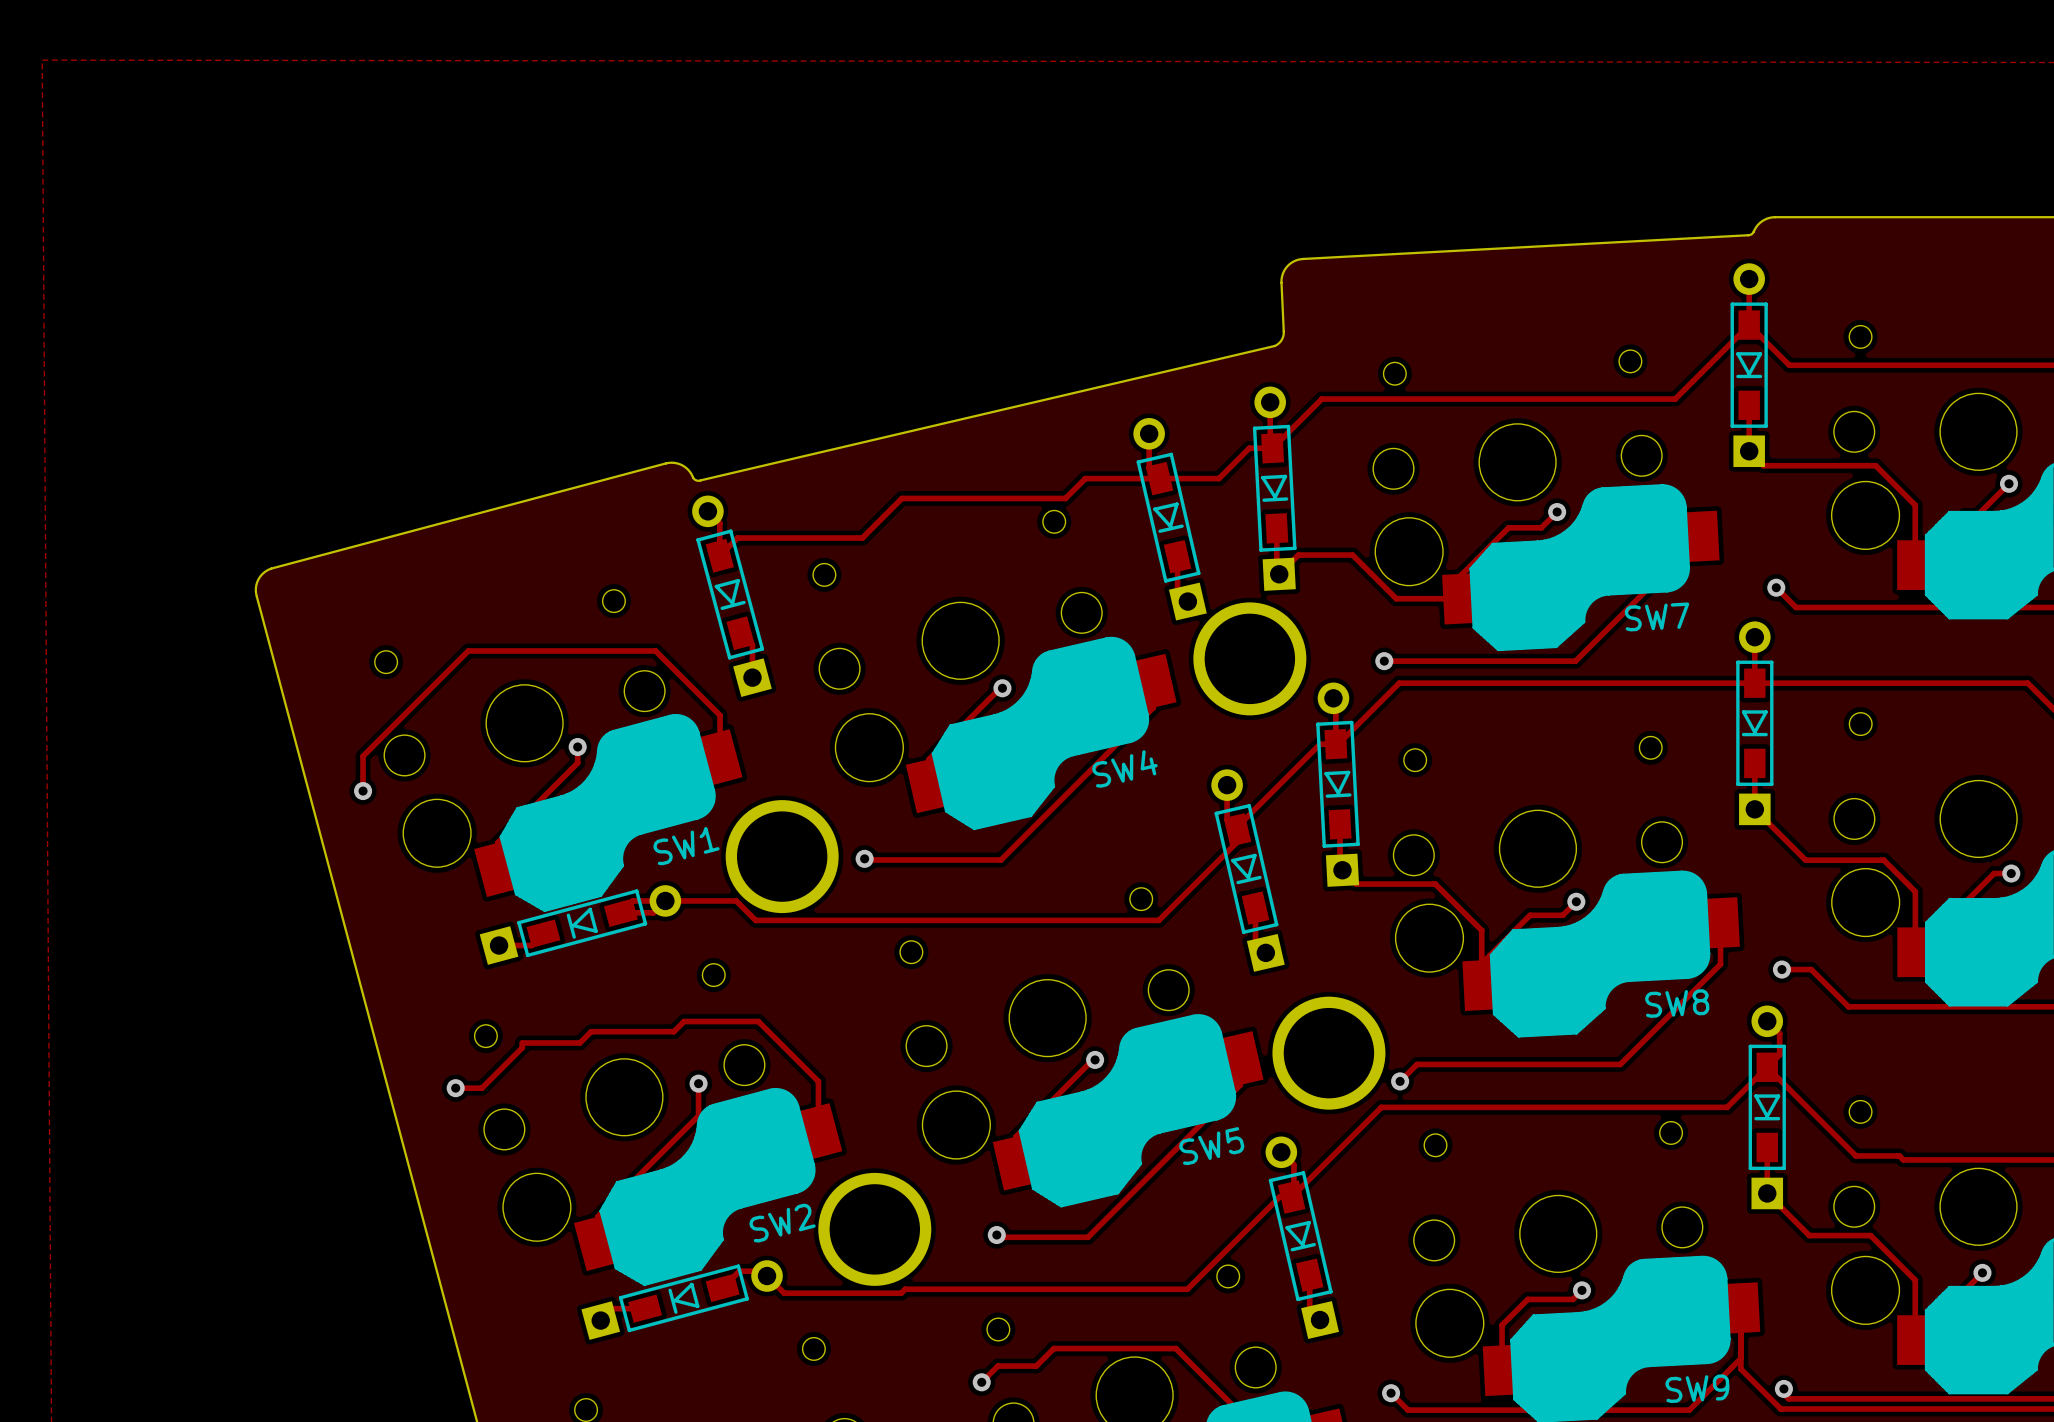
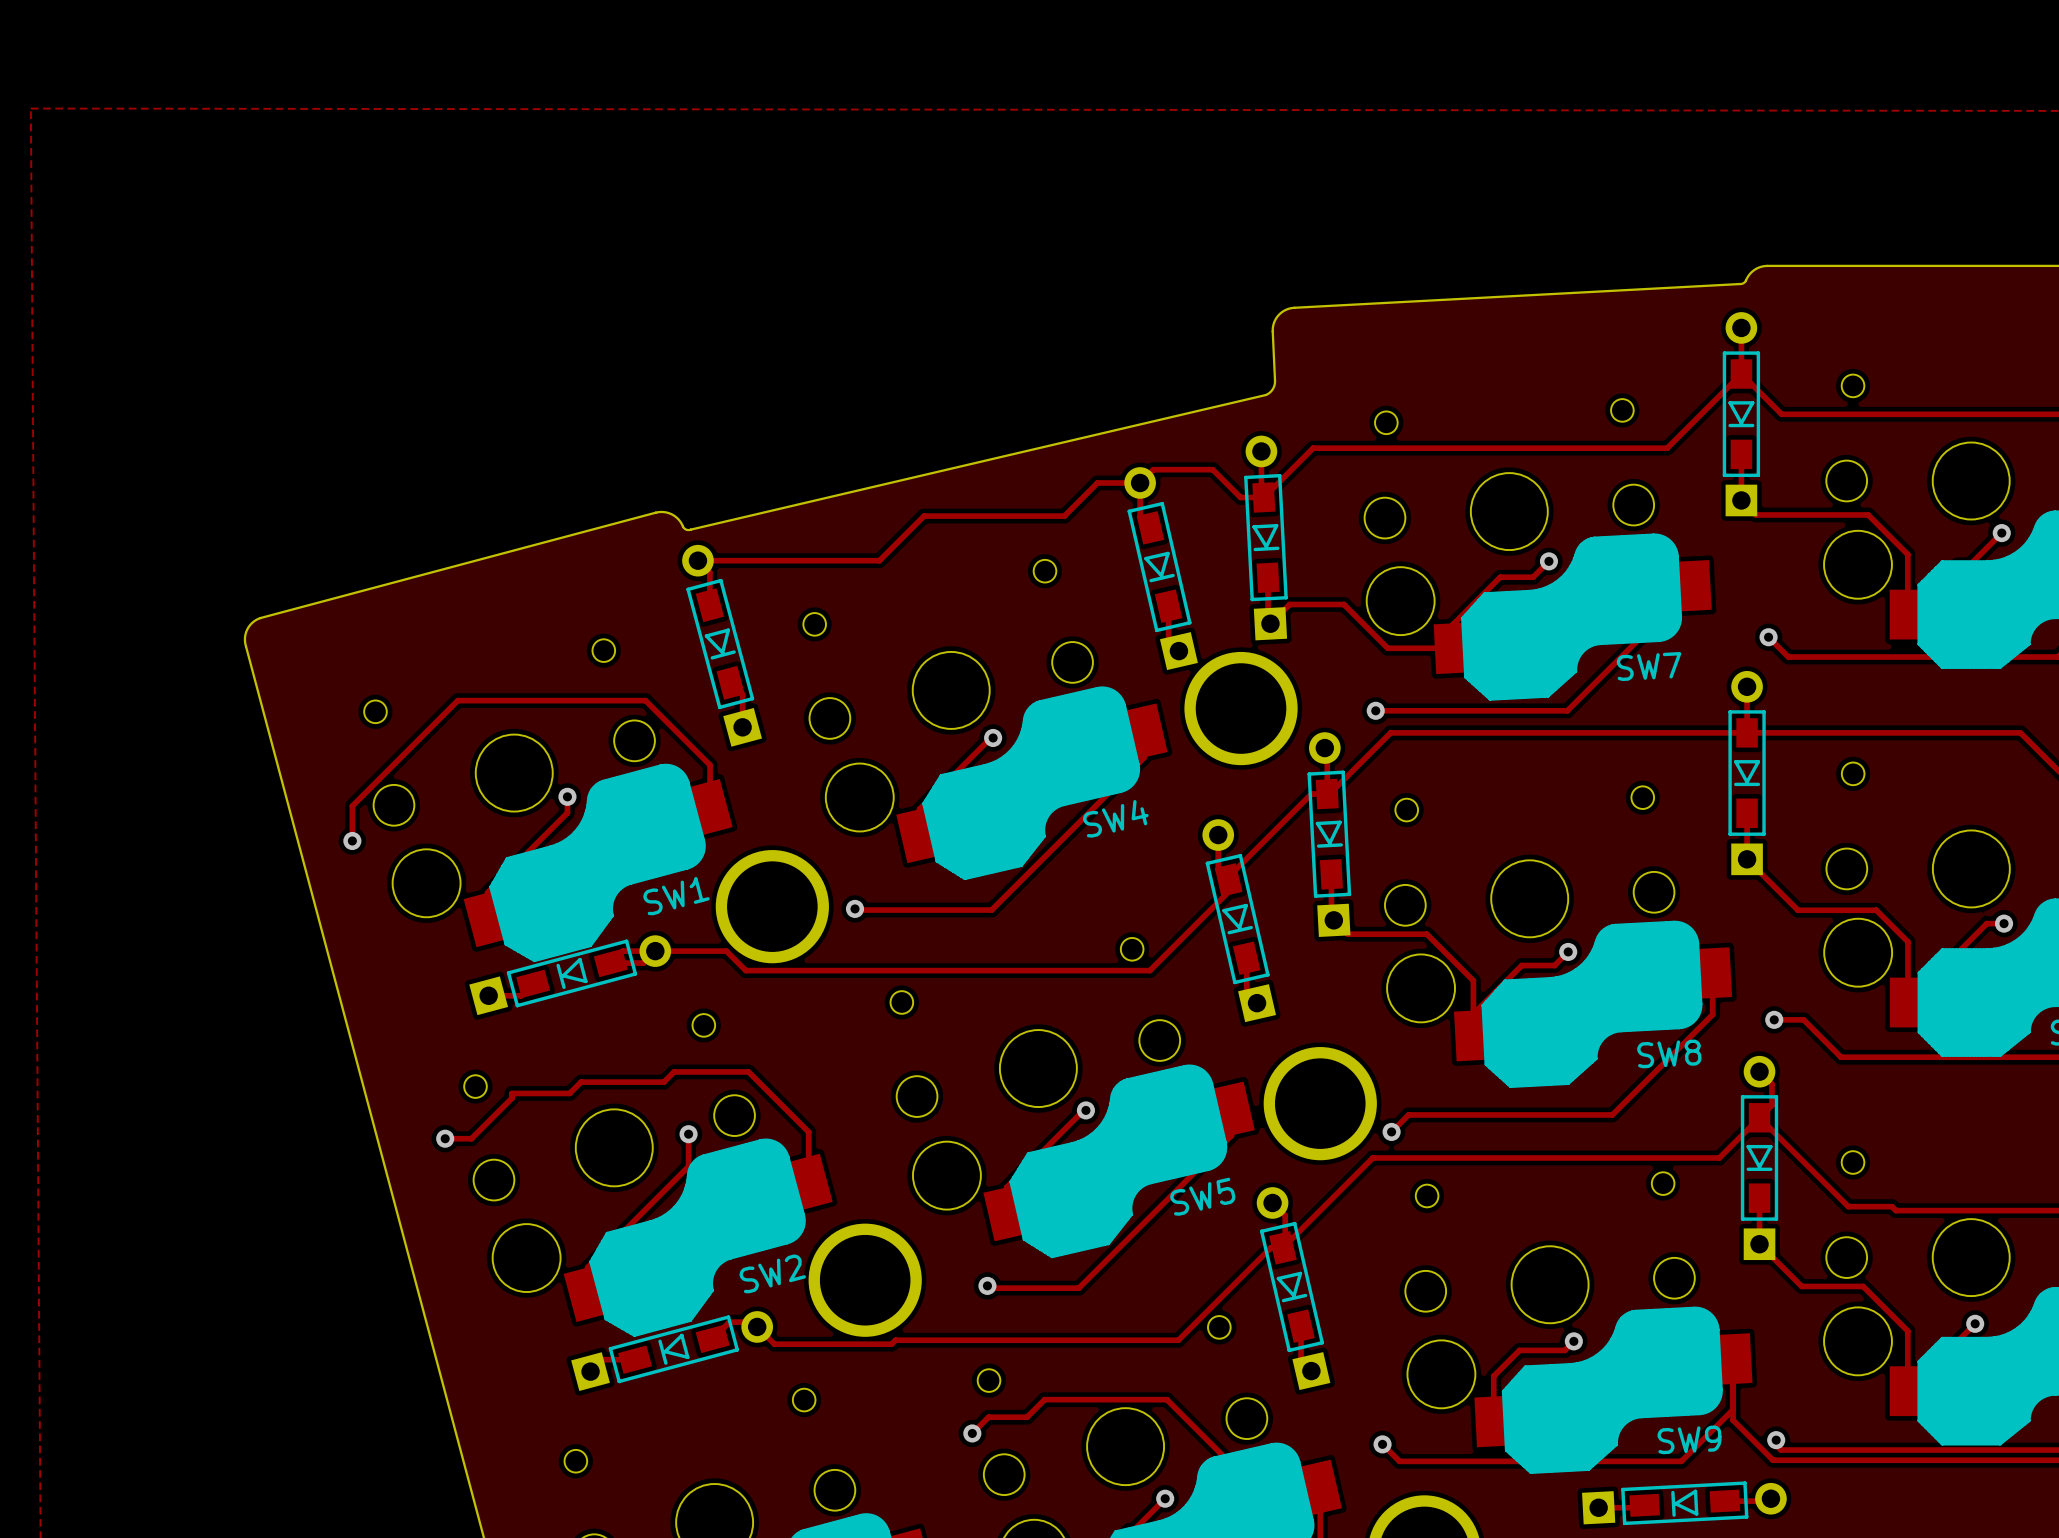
track: (1249, 448) (1219, 478) (1085, 478) (1065, 498) (901, 498) -> (1240, 497) (1212, 469) (1153, 469) (1140, 482) (1097, 482) (1064, 516) (924, 516) (892, 547)
track: (889, 511) (862, 538) (737, 538) (719, 555) -> (879, 560) (697, 560)

